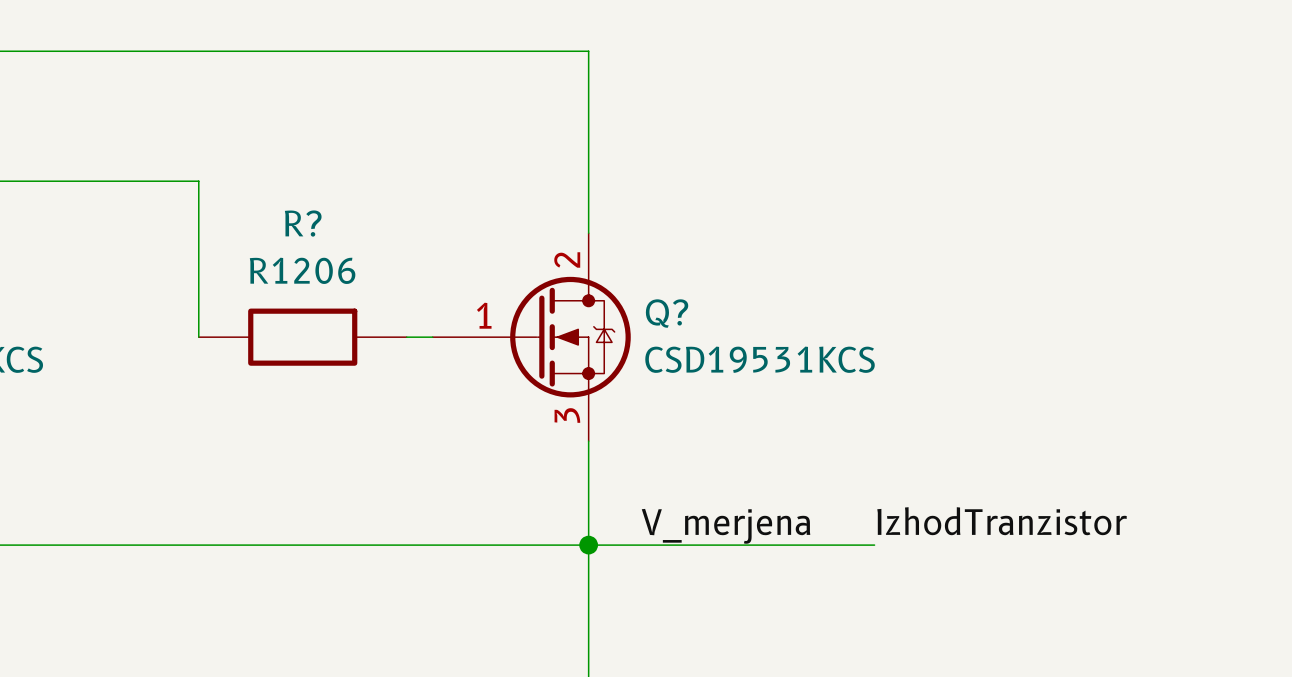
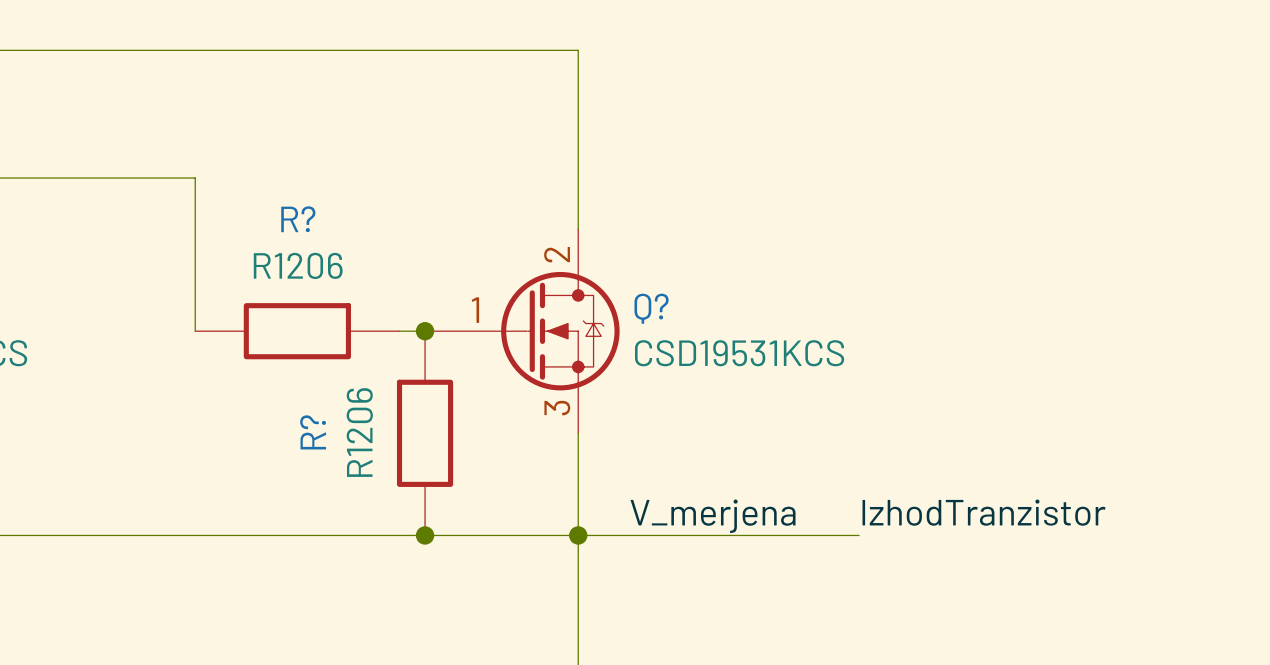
junction: none -> (425, 331)
R?: none -> R1206 (425, 433)
junction: none -> (425, 535)

